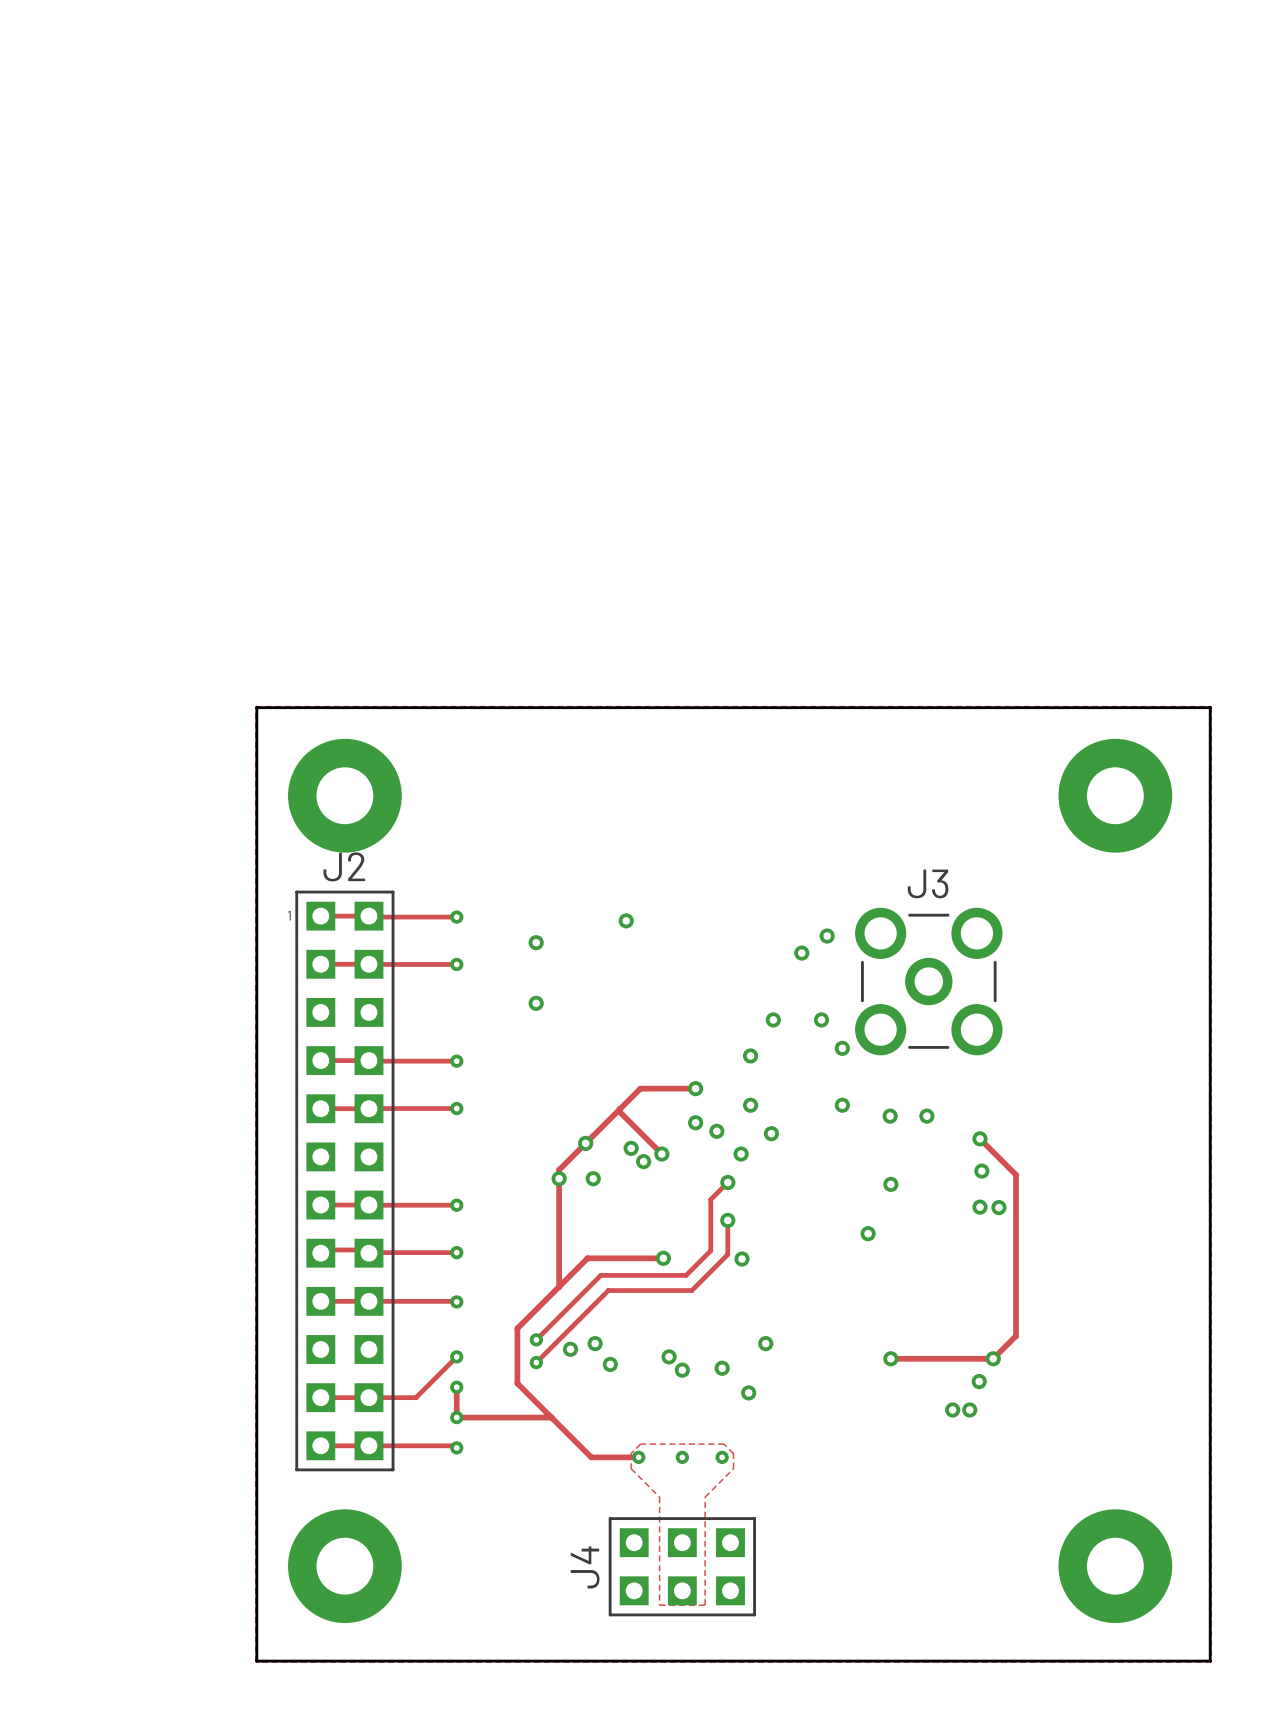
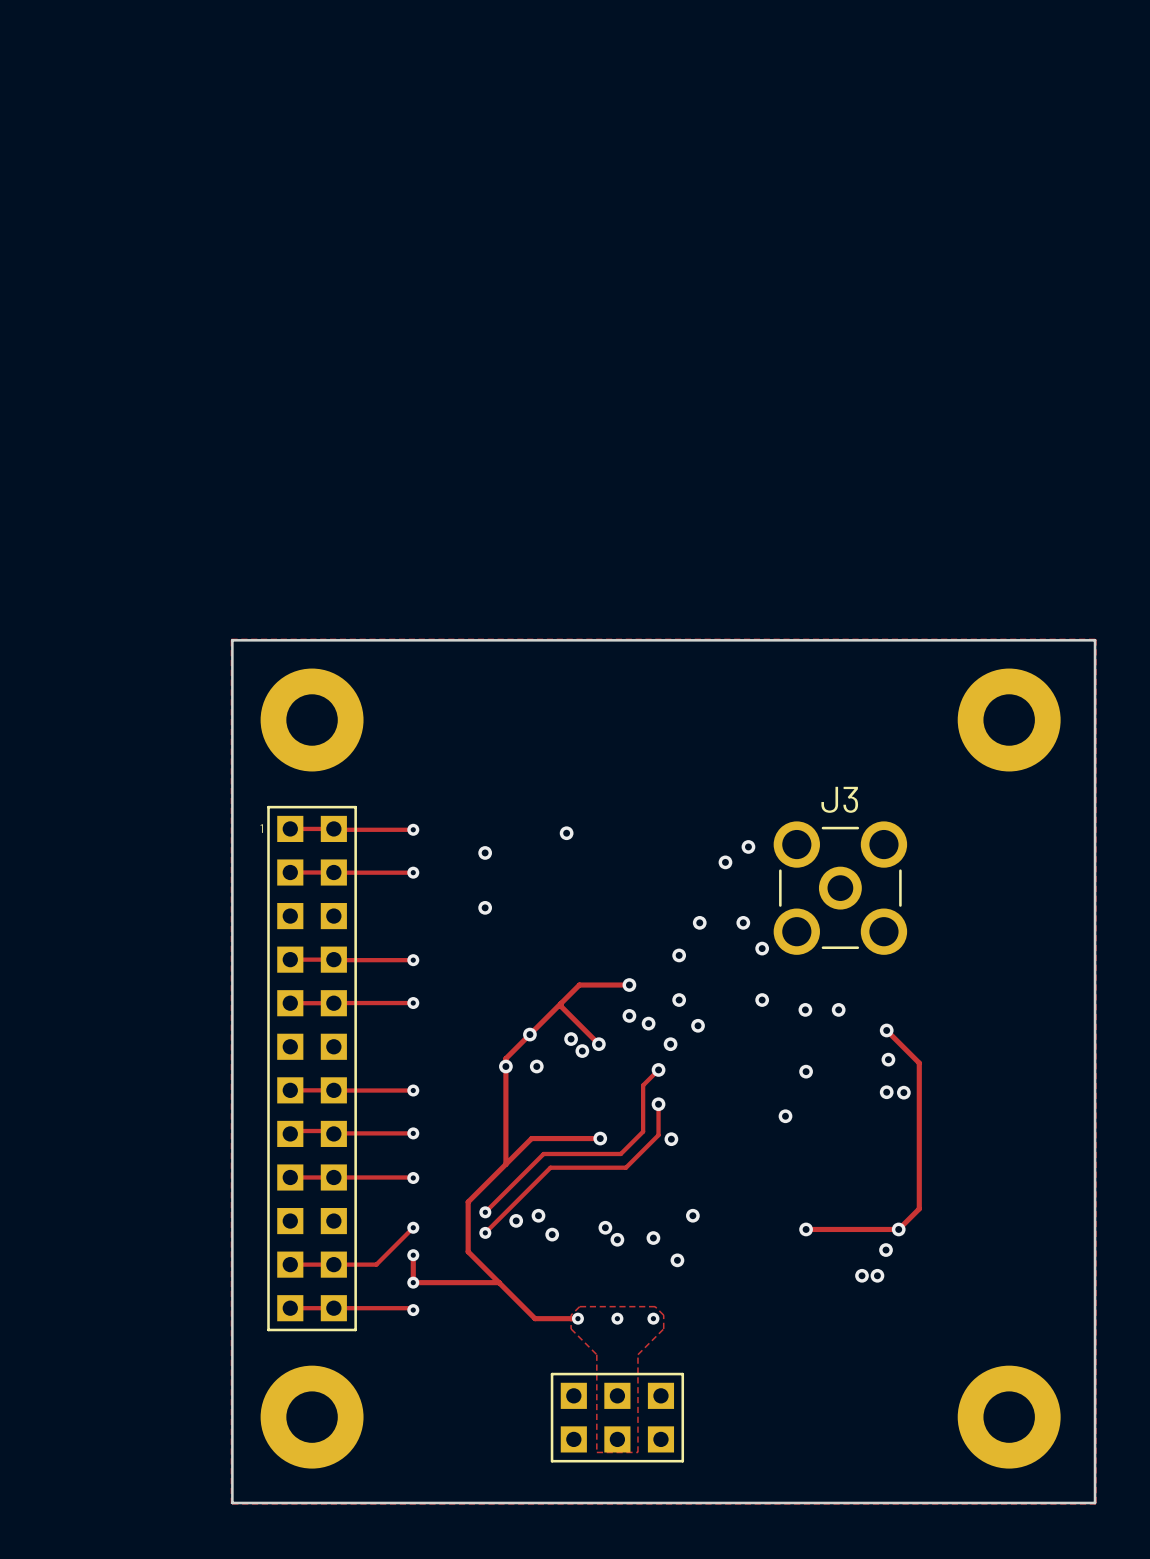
J2 name: J2 (344, 866) -> none
J4 name: J4 (585, 1567) -> none

